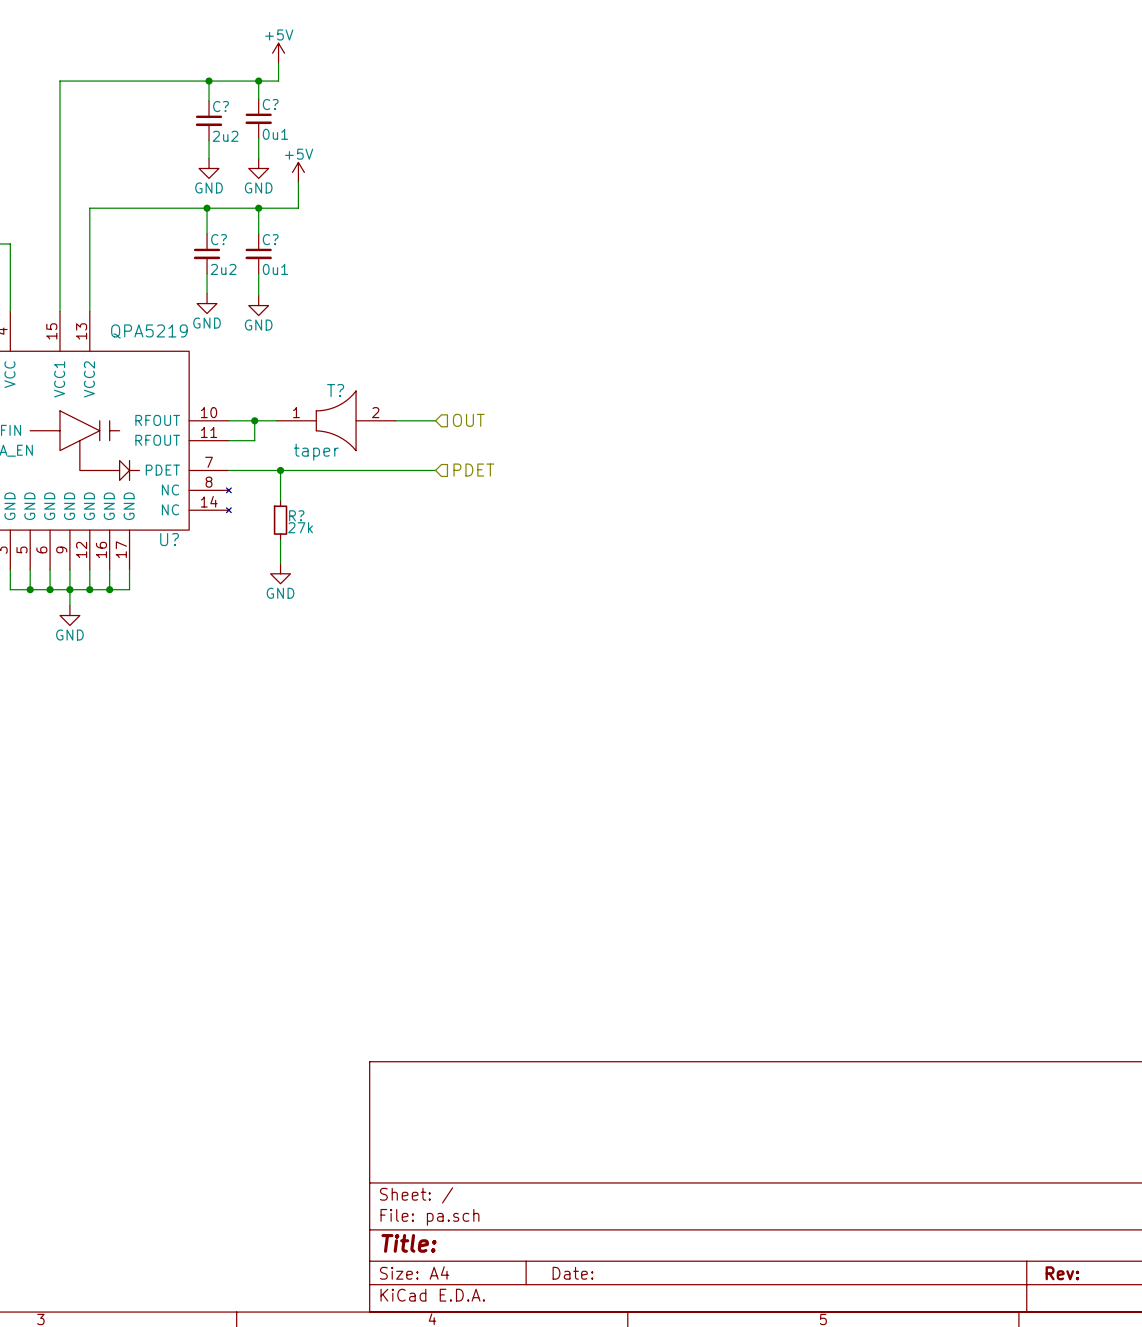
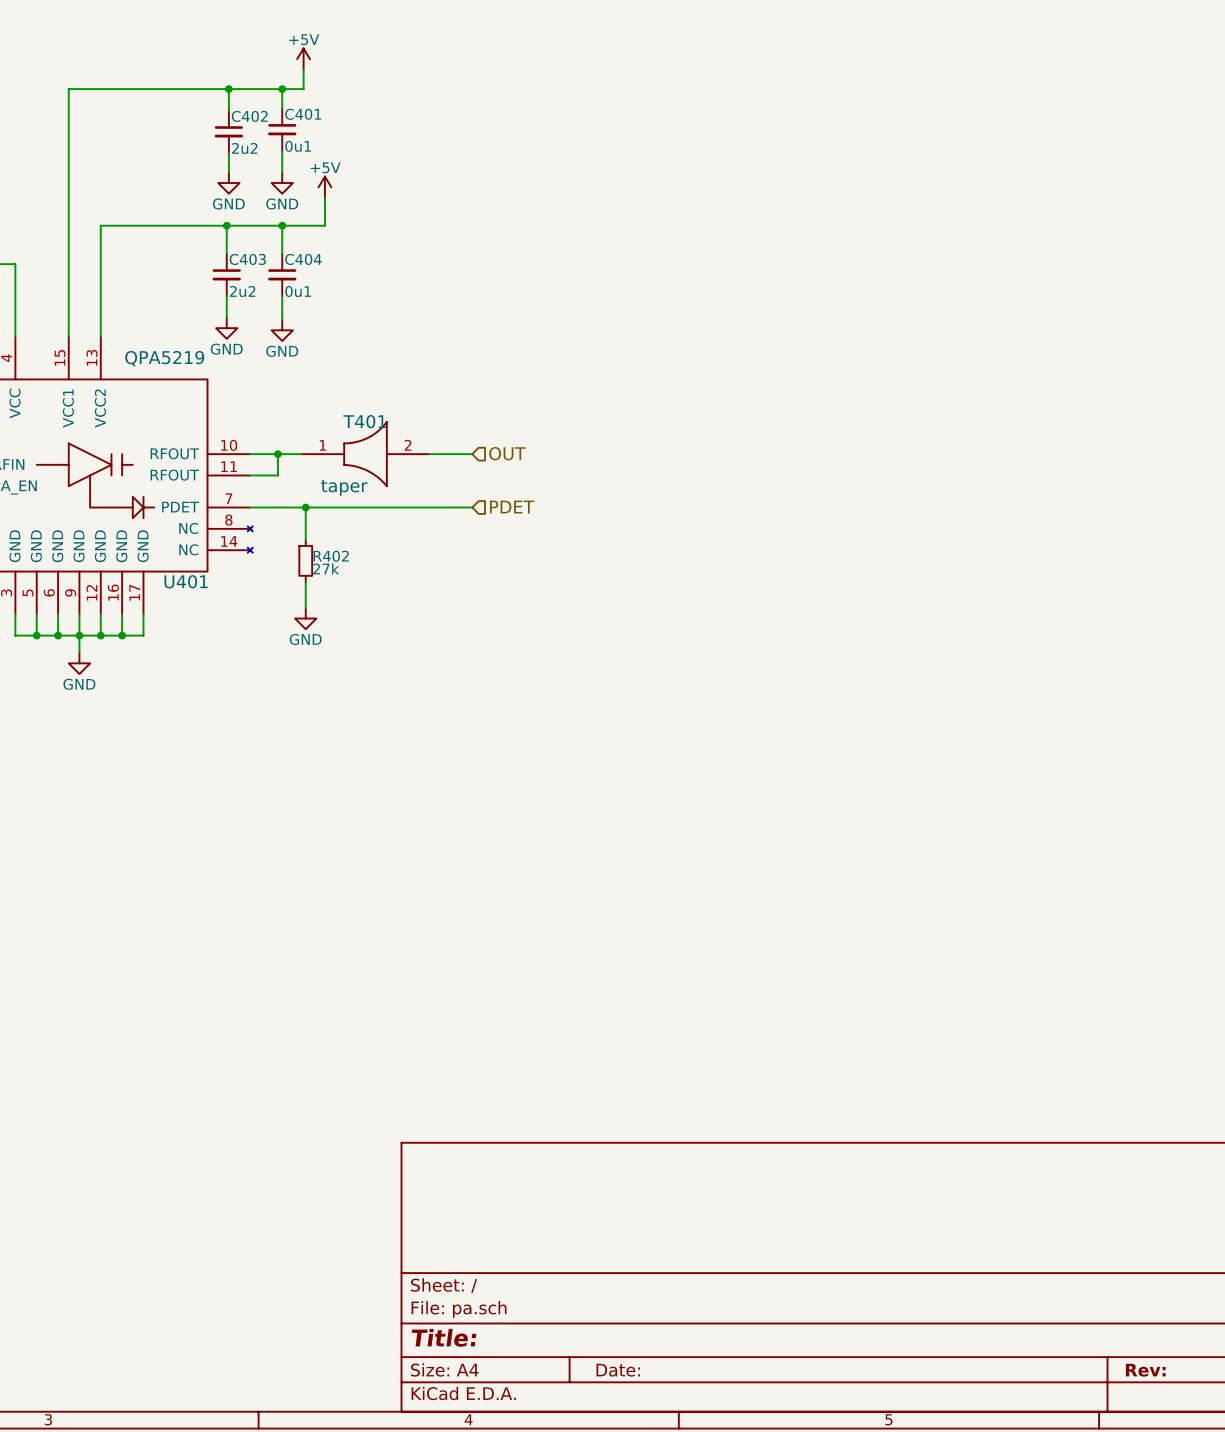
C? name: C? (270, 104) -> C401 (303, 114)
C? name: C? (221, 106) -> C402 (249, 116)
C? name: C? (219, 239) -> C403 (247, 259)
C? name: C? (270, 239) -> C404 (303, 259)
T? name: T? (335, 390) -> T401 (364, 421)
R? name: R? (296, 515) -> R402 (331, 556)
U? name: U? (169, 539) -> U401 (186, 581)

